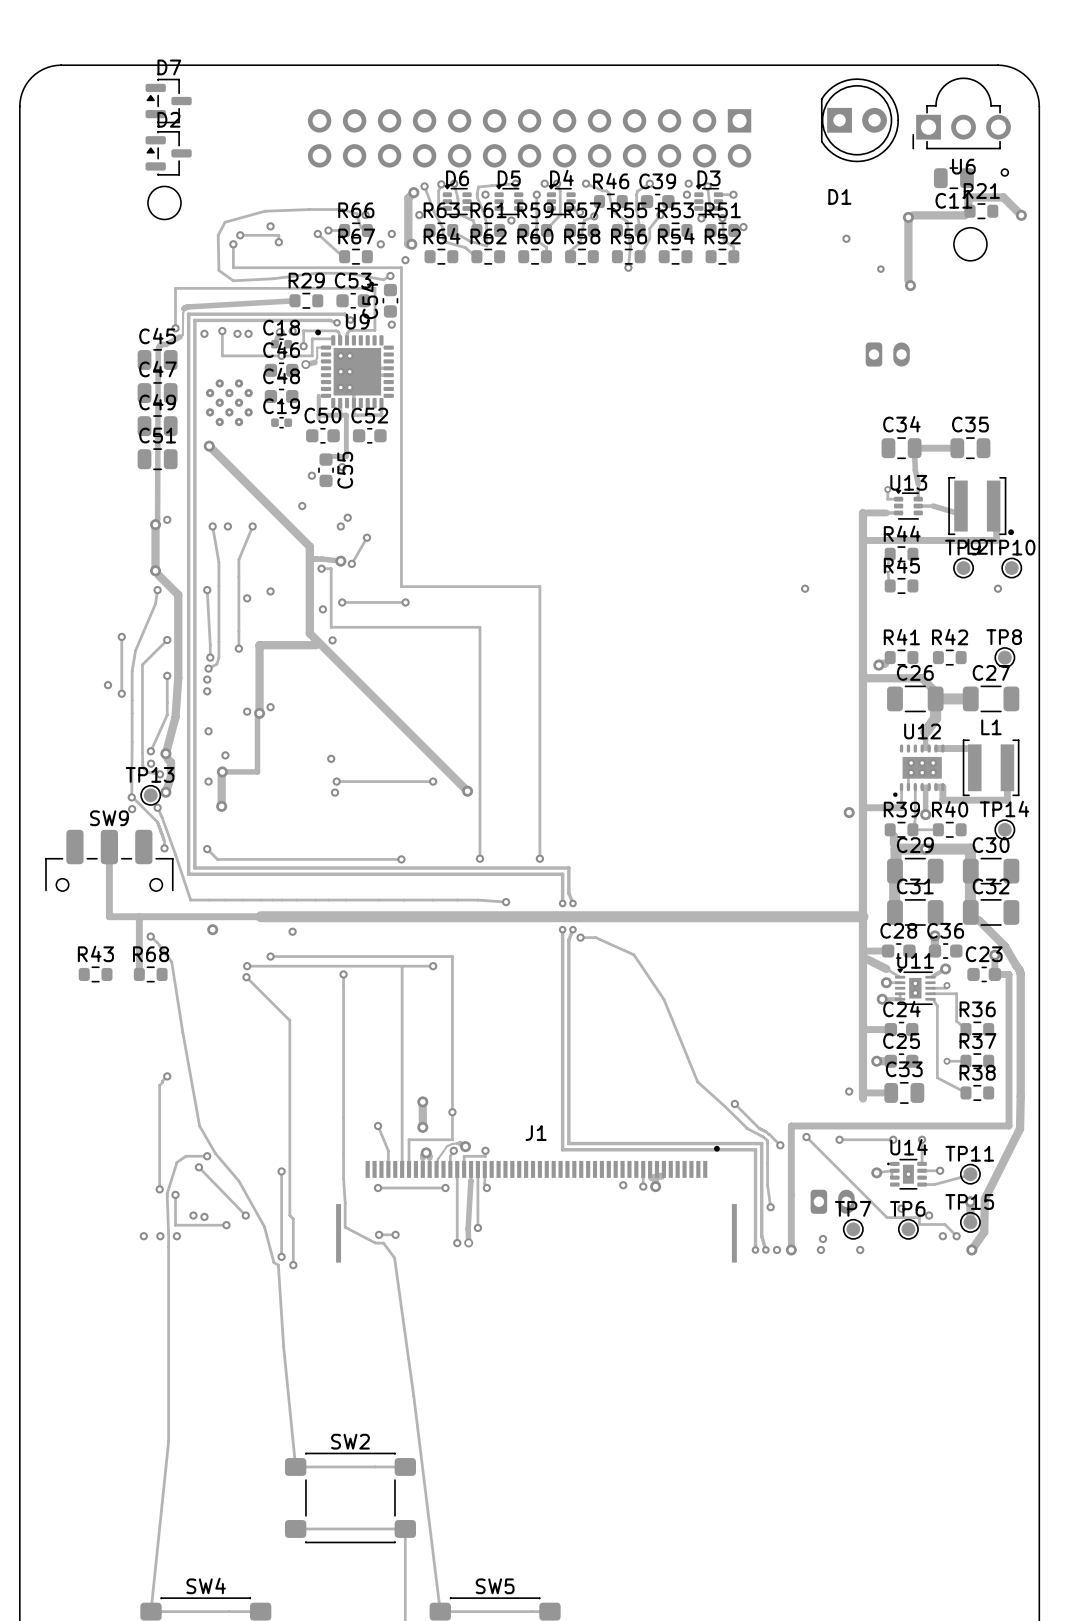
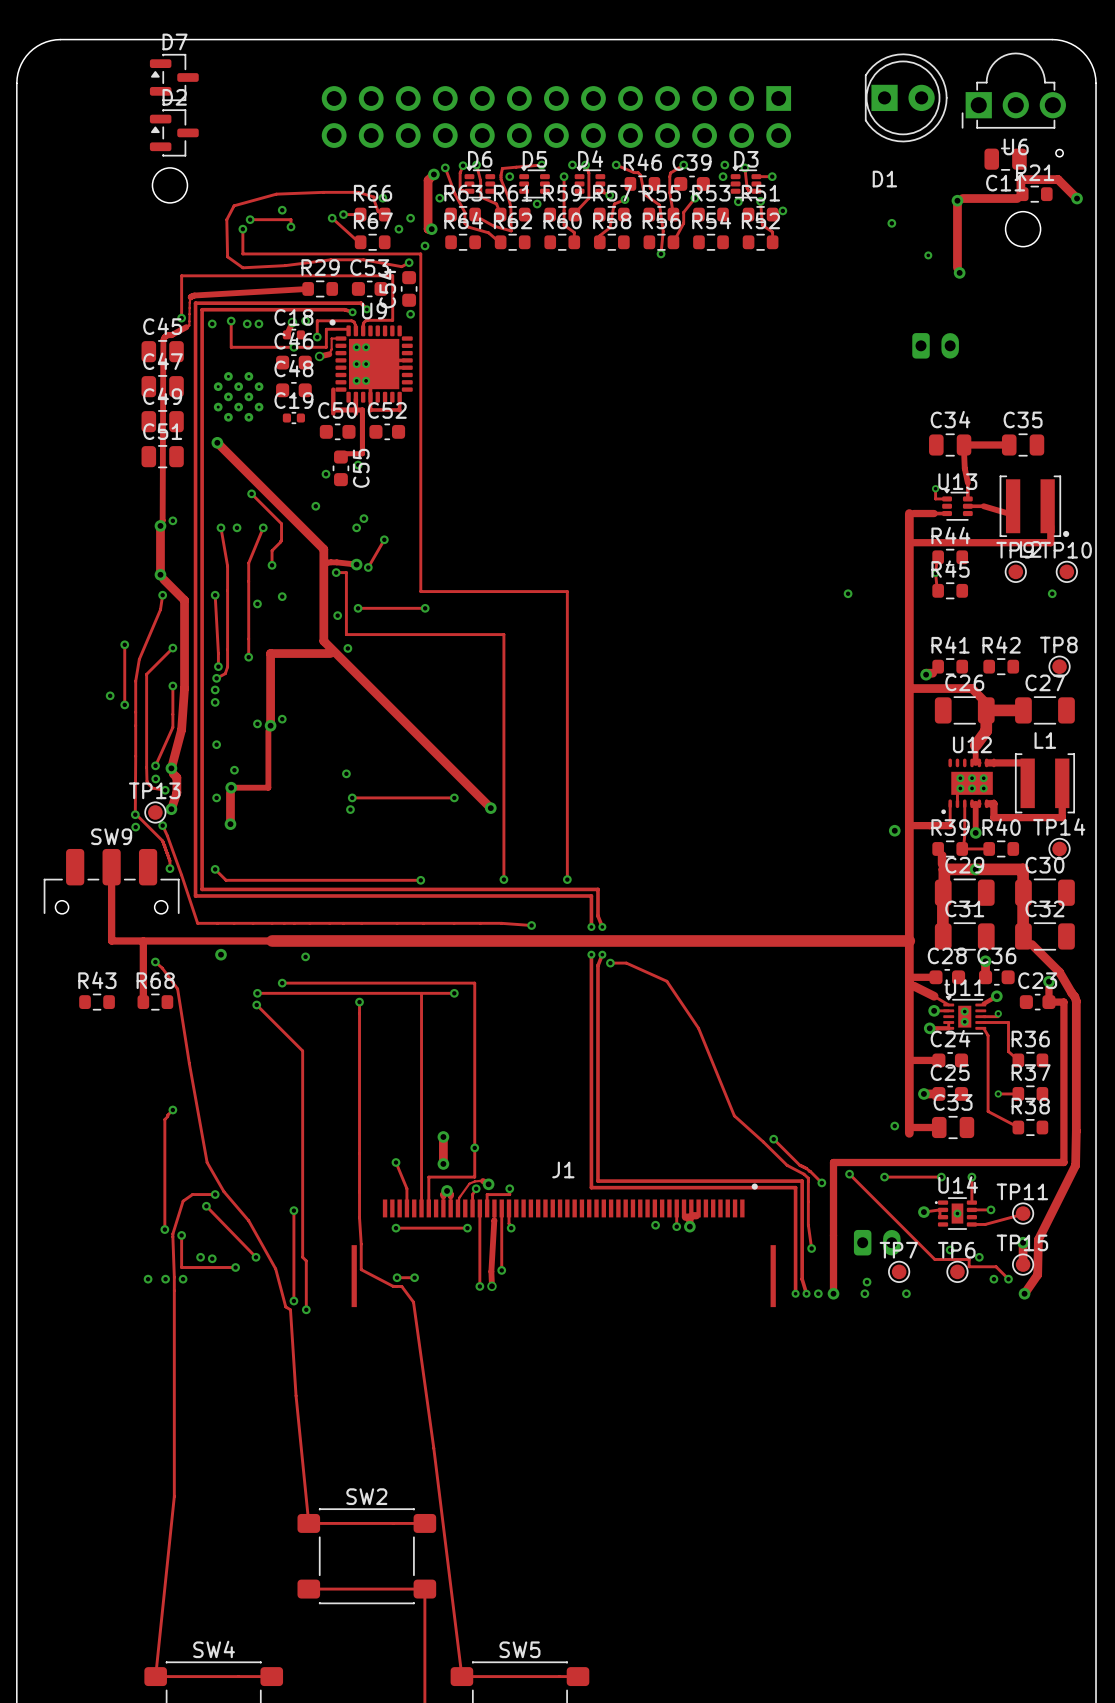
track: none -> (251, 493) (281, 523) (281, 540) (272, 550) (272, 565)
via: none -> (251, 493)
via: none -> (272, 565)

